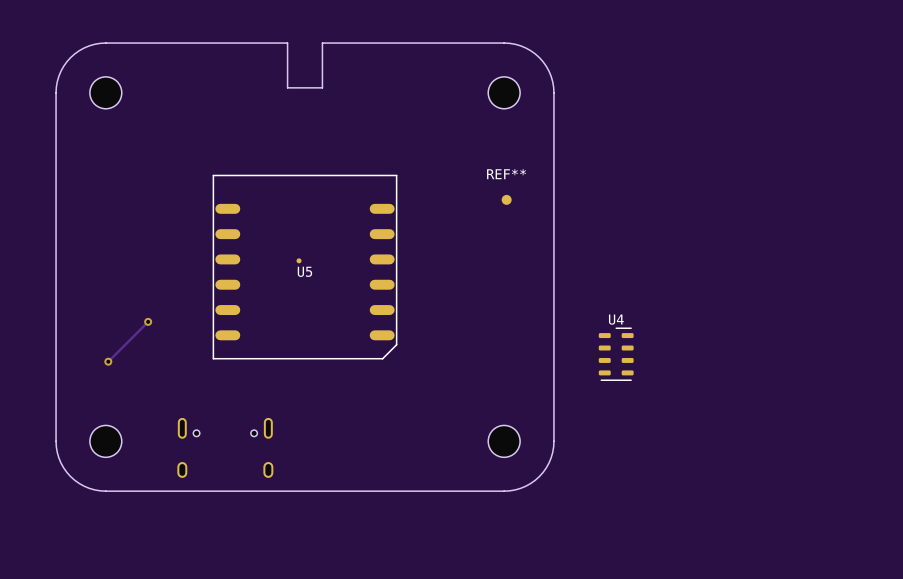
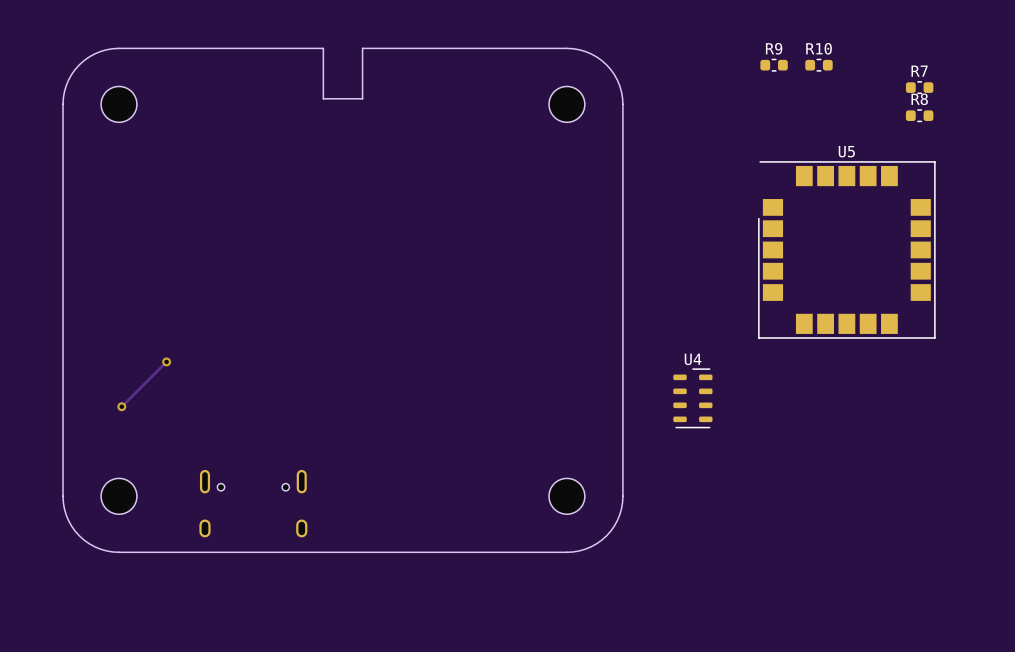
R9: none -> (774, 65)
R10: none -> (818, 65)
R7: none -> (919, 87)
R8: none -> (919, 115)
U5 footprint: [212, 174, 398, 360] -> [758, 161, 936, 339]
REF**: (506, 199) -> none
U5 name position: U5 (304, 271) -> U5 (846, 151)

